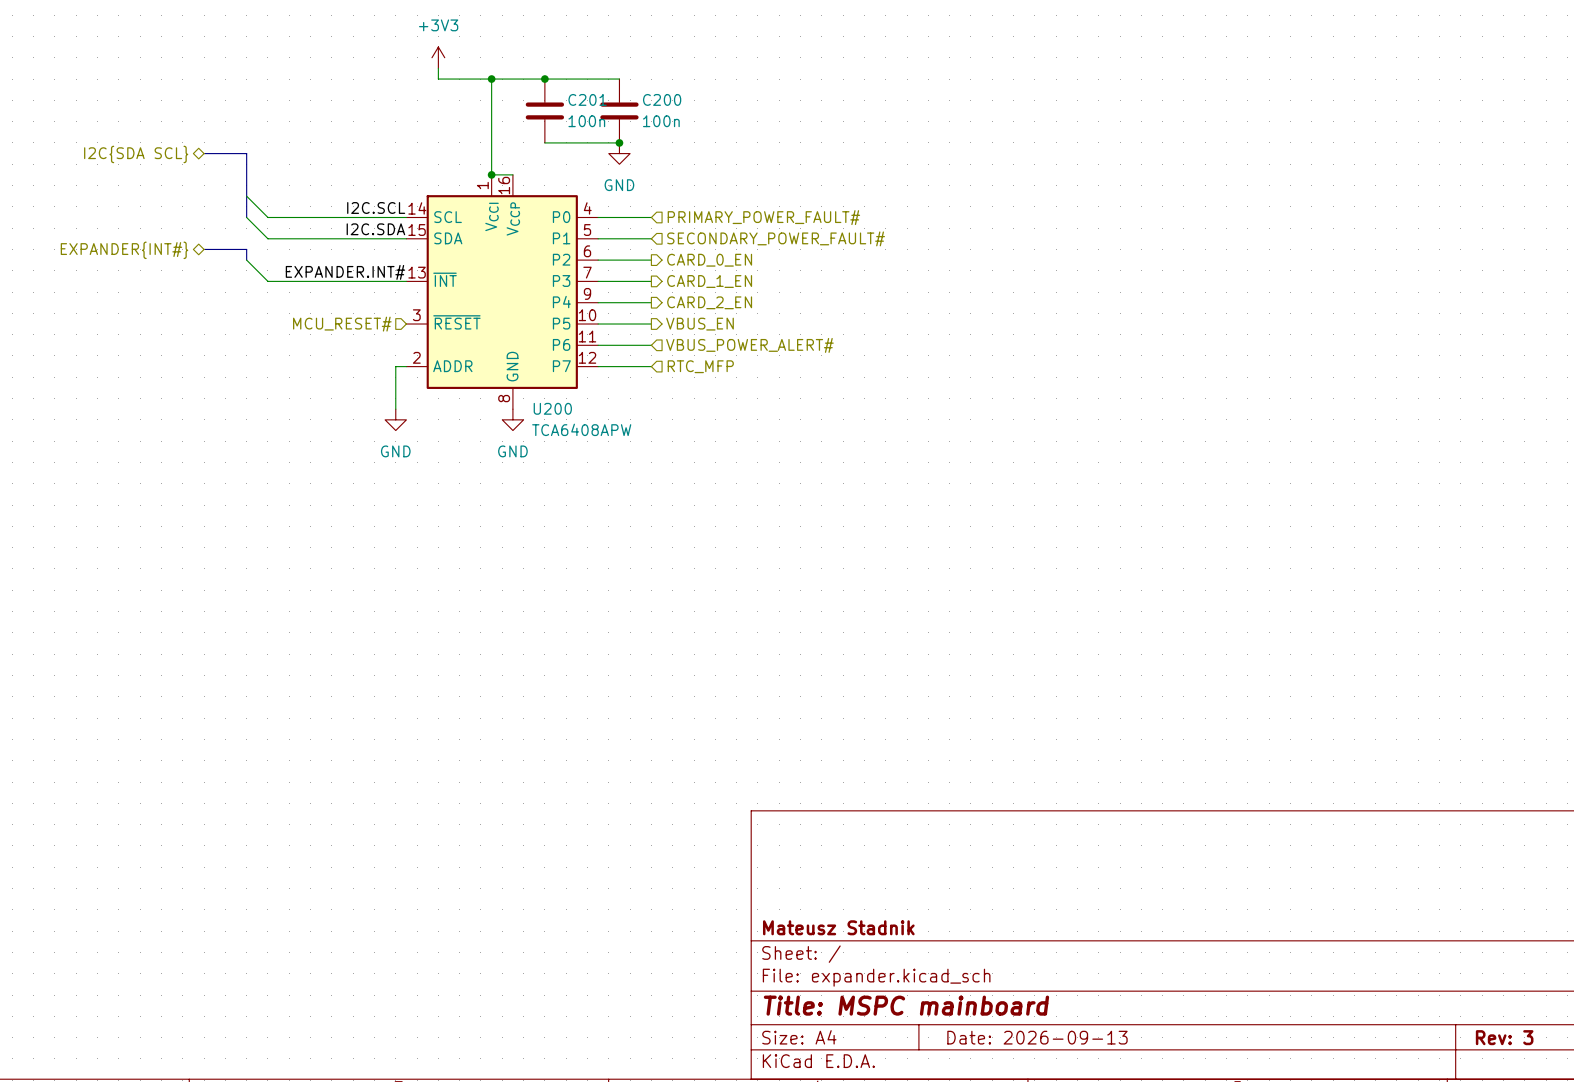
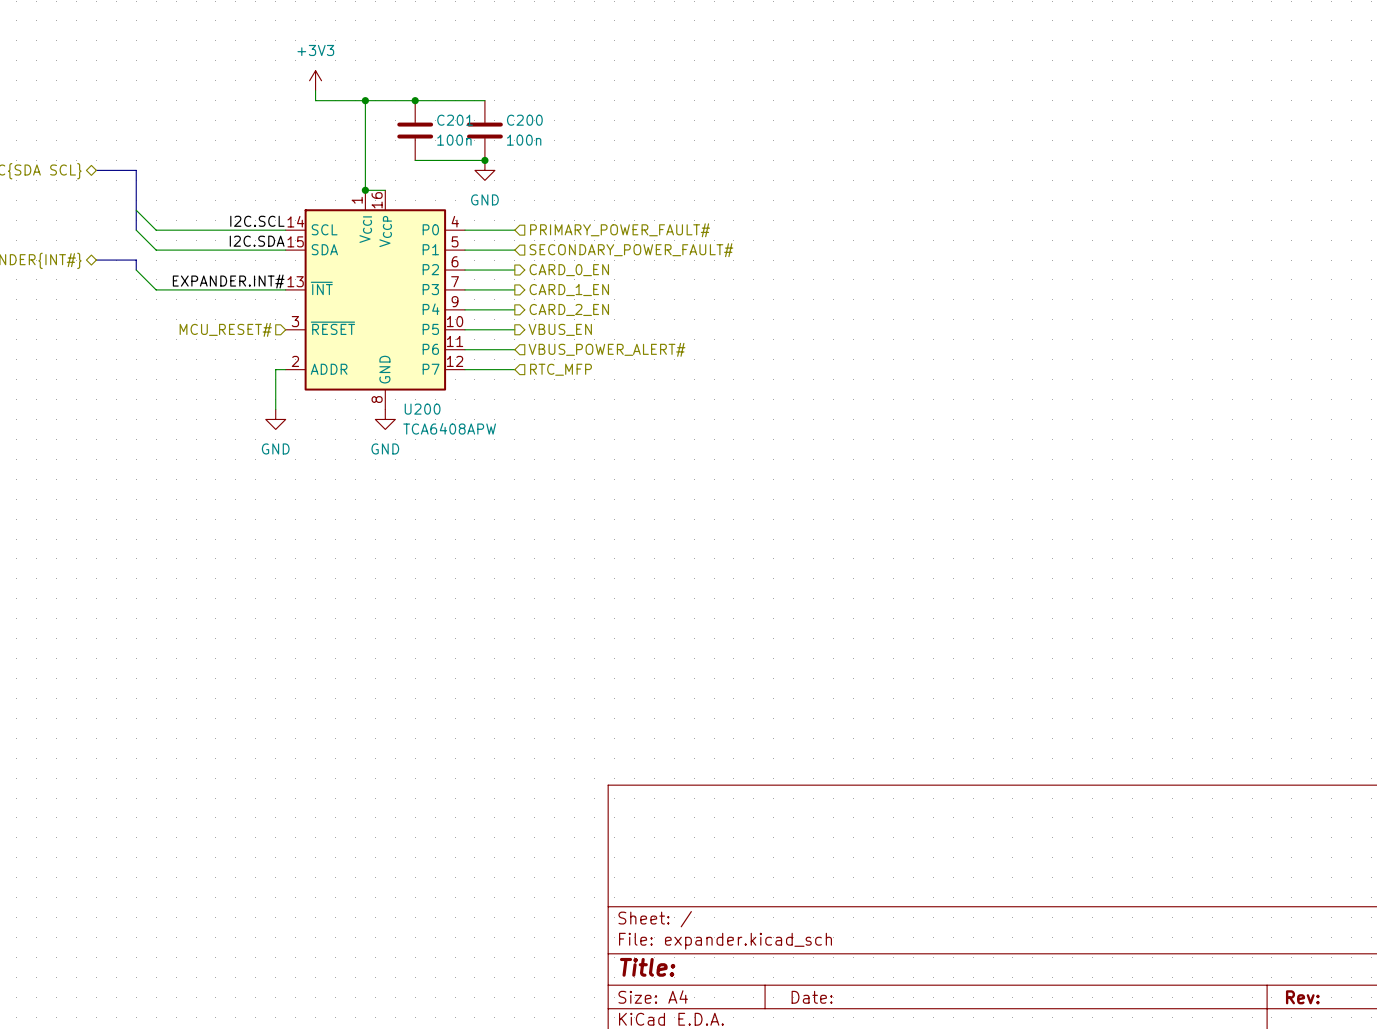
title block: Mateusz Stadnik (838, 927) -> none
title block: Title: MSPC mainboard (906, 1005) -> Title: (647, 967)
title block: Date: 2026-09-13 (1037, 1037) -> Date: (812, 997)
title block: Rev: 3 (1504, 1037) -> Rev: (1302, 997)

